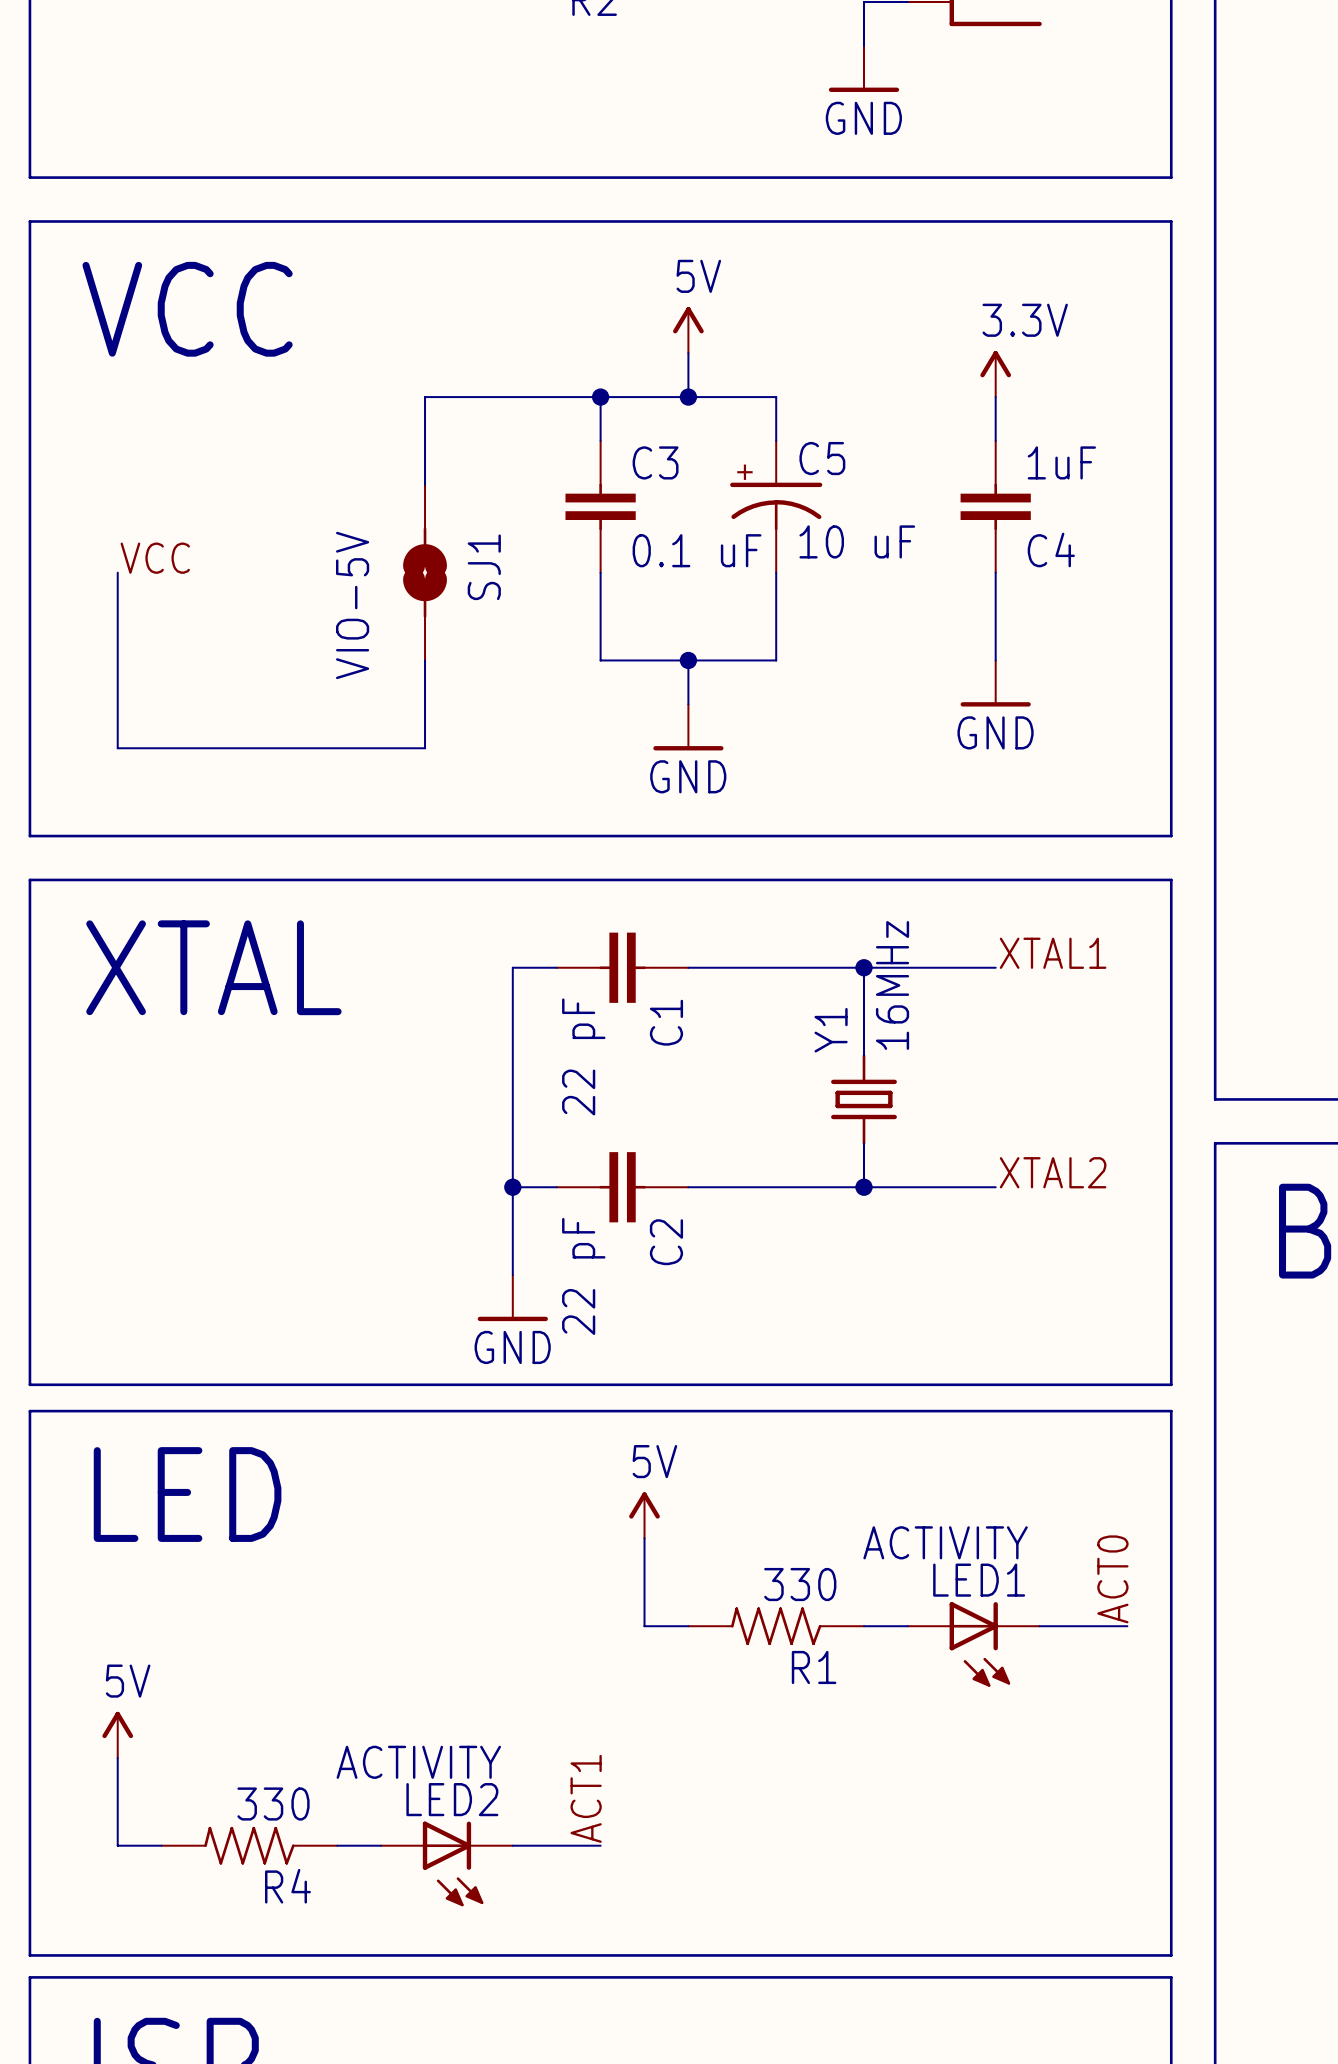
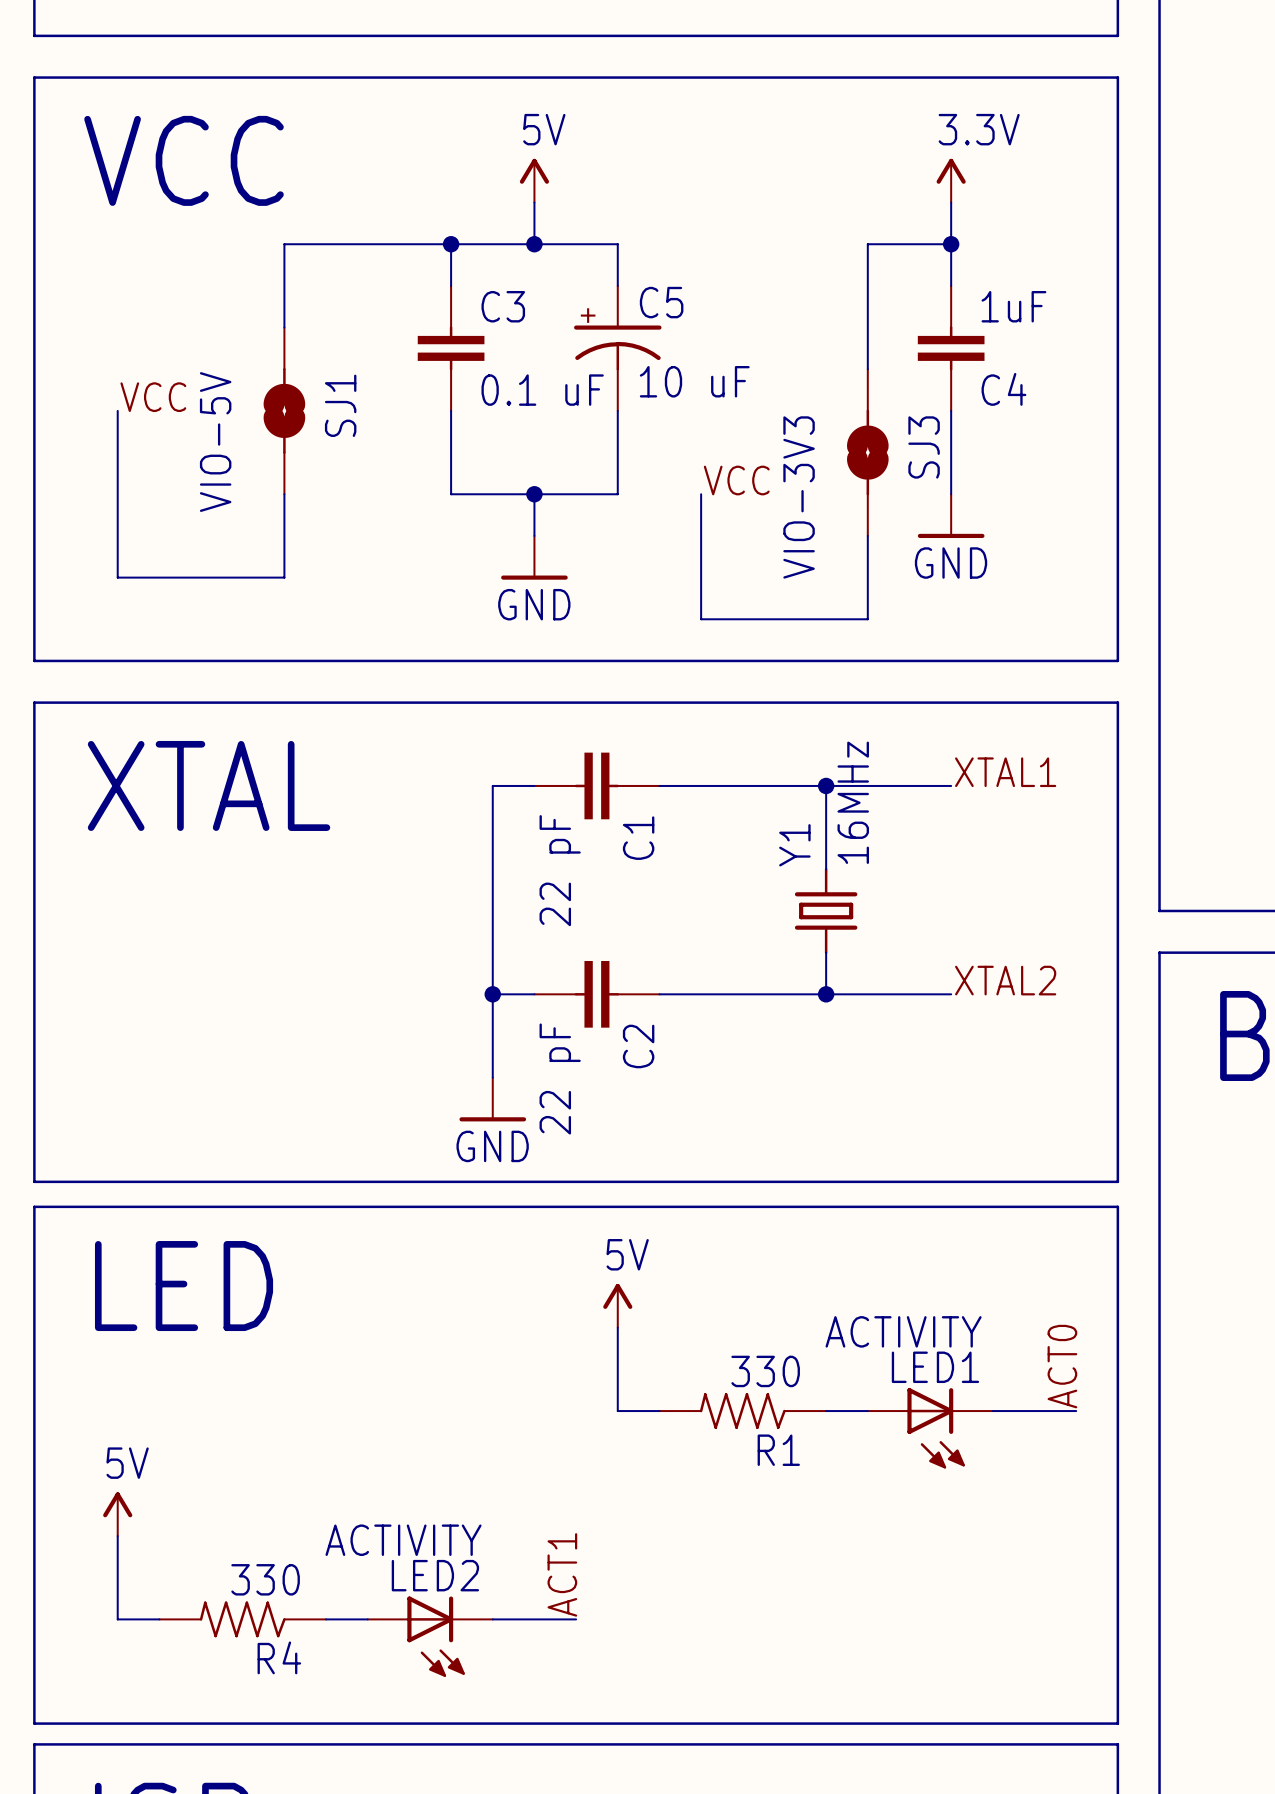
power symbol position: 5V (688, 330) -> 5V (534, 180)
wire: (688, 353) (688, 397) -> (534, 202) (534, 244)
wire: none -> (951, 202) (951, 244) (867, 244) (867, 369)
power symbol position: 3.3V (995, 374) -> 3.3V (951, 180)
wire: (425, 397) (425, 484) -> (409, 244) (284, 244) (284, 327)
junction: none -> (451, 244)
wire: (600, 397) (600, 440) -> (451, 244) (451, 285)
junction position: (600, 397) -> (534, 244)
wire: (644, 397) (776, 397) (776, 440) -> (617, 244) (617, 285)
junction: (688, 397) -> none
junction: none -> (951, 244)
C3 position: (600, 506) -> (451, 348)
C5 position: (776, 506) -> (617, 348)
SJ1 position: (425, 572) -> (284, 410)
wire: (600, 572) (600, 660) -> (451, 410) (451, 494) (576, 494)
wire: (776, 572) (776, 660) (644, 660) -> (617, 410) (617, 494)
SJ3: none -> VIO-3V3 (867, 452)
label: none -> VCC (736, 480)
wire: (425, 660) (425, 748) (293, 748) -> (284, 494) (284, 577)
junction: none -> (534, 494)
wire: (688, 660) (688, 704) -> (534, 494) (534, 535)
junction: (688, 660) -> none
wire: none -> (701, 494) (701, 619) (867, 619) (867, 535)
power symbol position: GND (688, 727) -> GND (534, 557)

